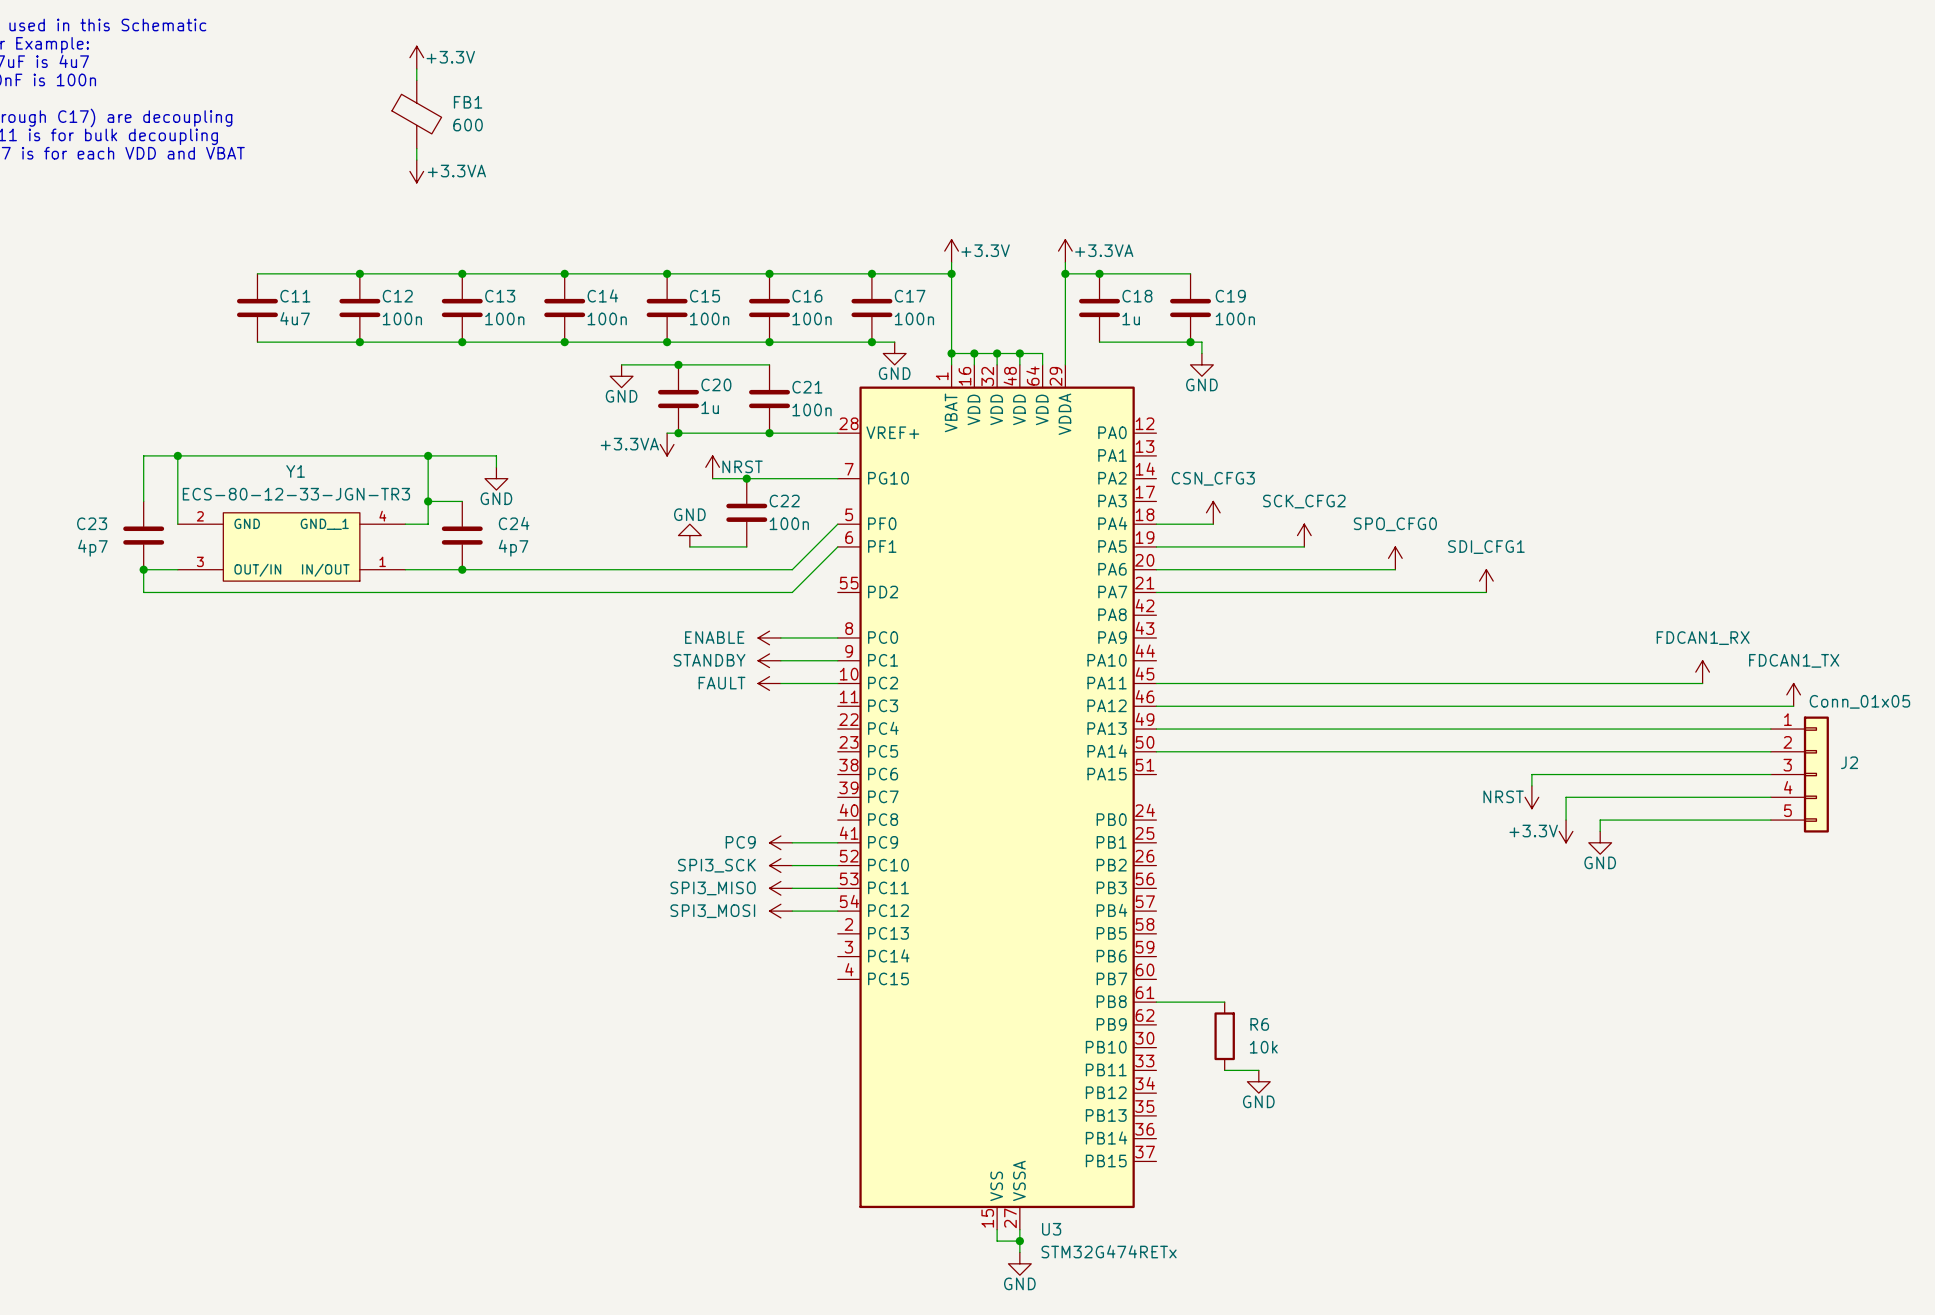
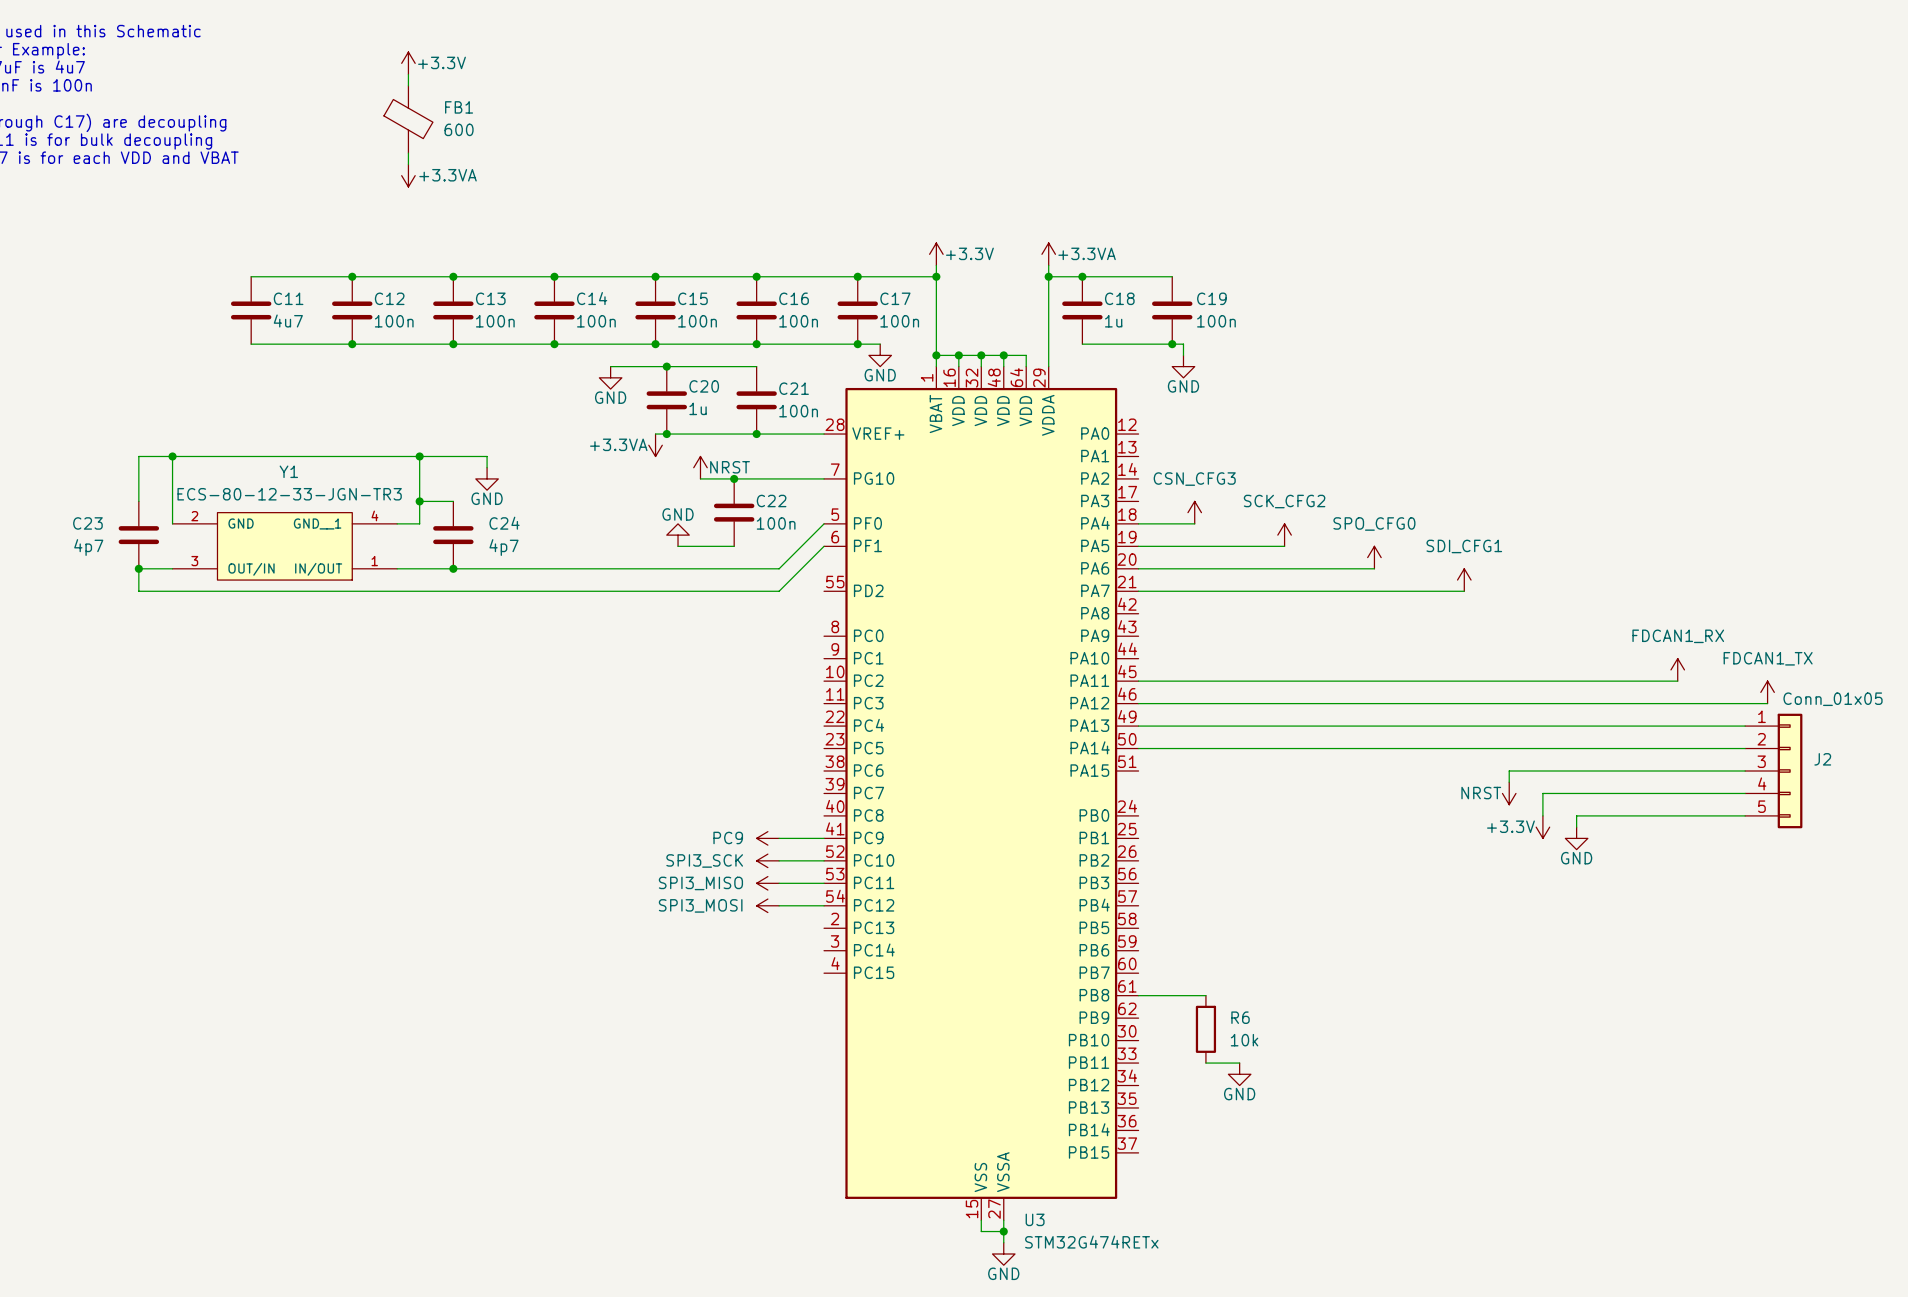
power symbol: ENABLE (769, 637) -> none
wire: (780, 637) (837, 637) -> none
power symbol: STANDBY (769, 660) -> none
wire: (780, 660) (837, 660) -> none
power symbol: FAULT (769, 683) -> none
wire: (780, 683) (837, 683) -> none

